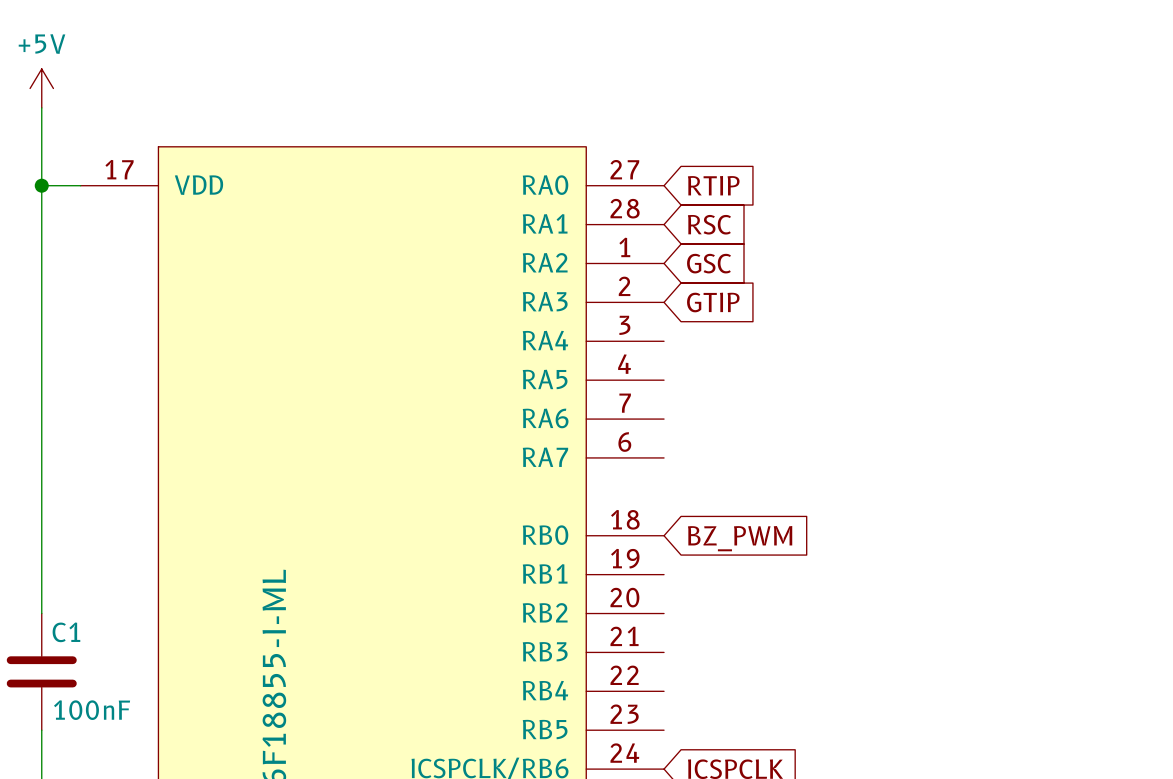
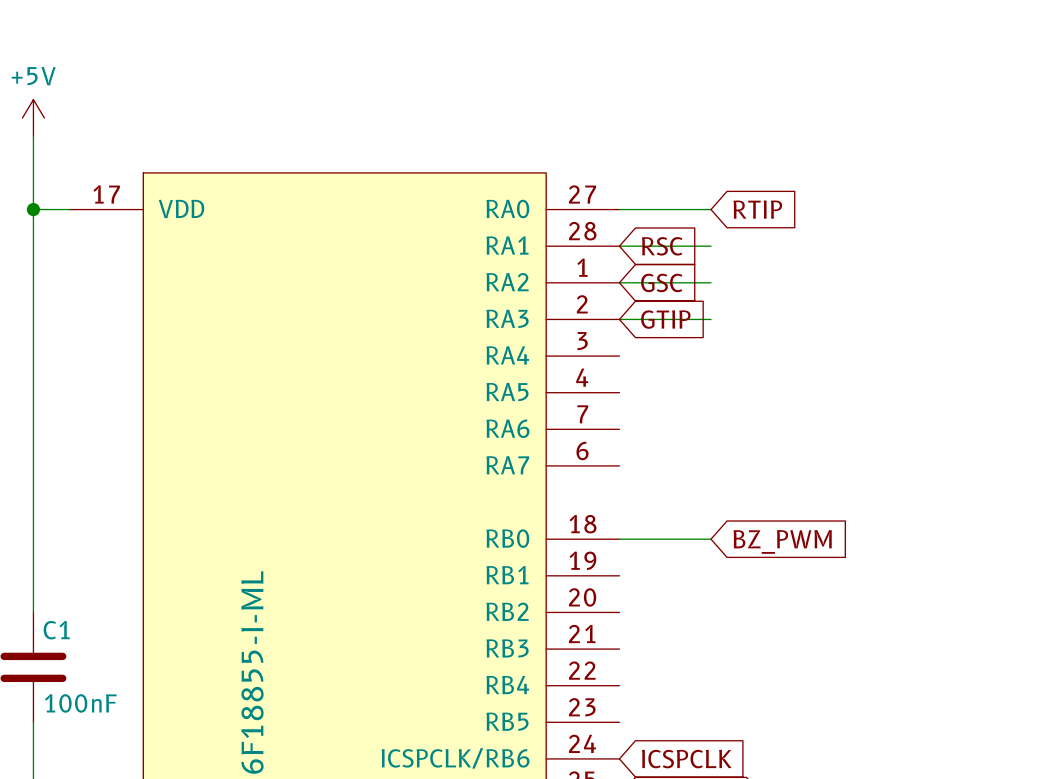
wire: none -> (619, 209) (711, 209)
global label position: RTIP (713, 185) -> RTIP (757, 209)
wire: none -> (619, 246) (711, 246)
wire: none -> (619, 282) (711, 282)
wire: none -> (619, 319) (711, 319)
wire: none -> (619, 539) (711, 539)
global label position: BZ_PWM (740, 538) -> BZ_PWM (782, 541)

